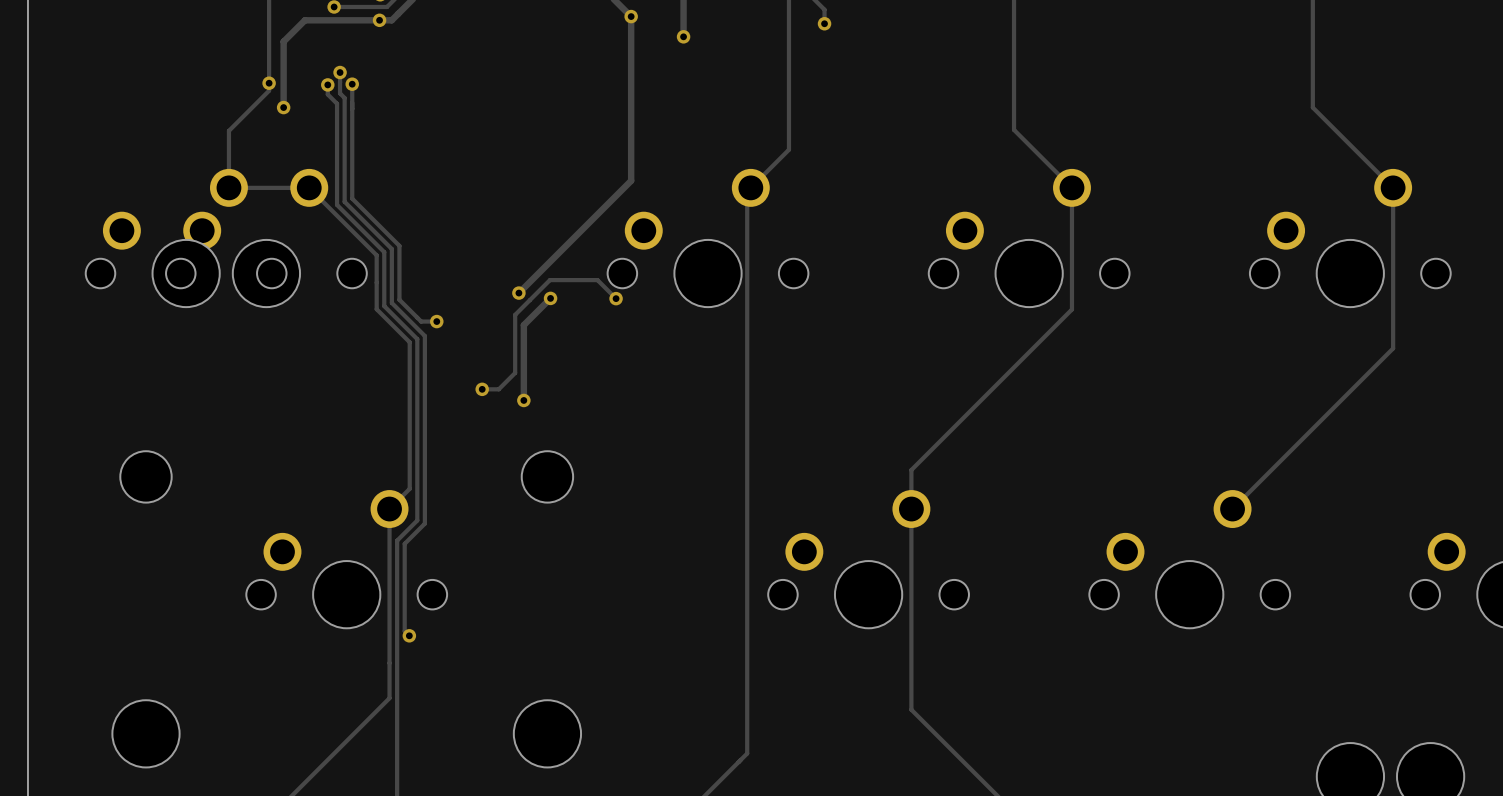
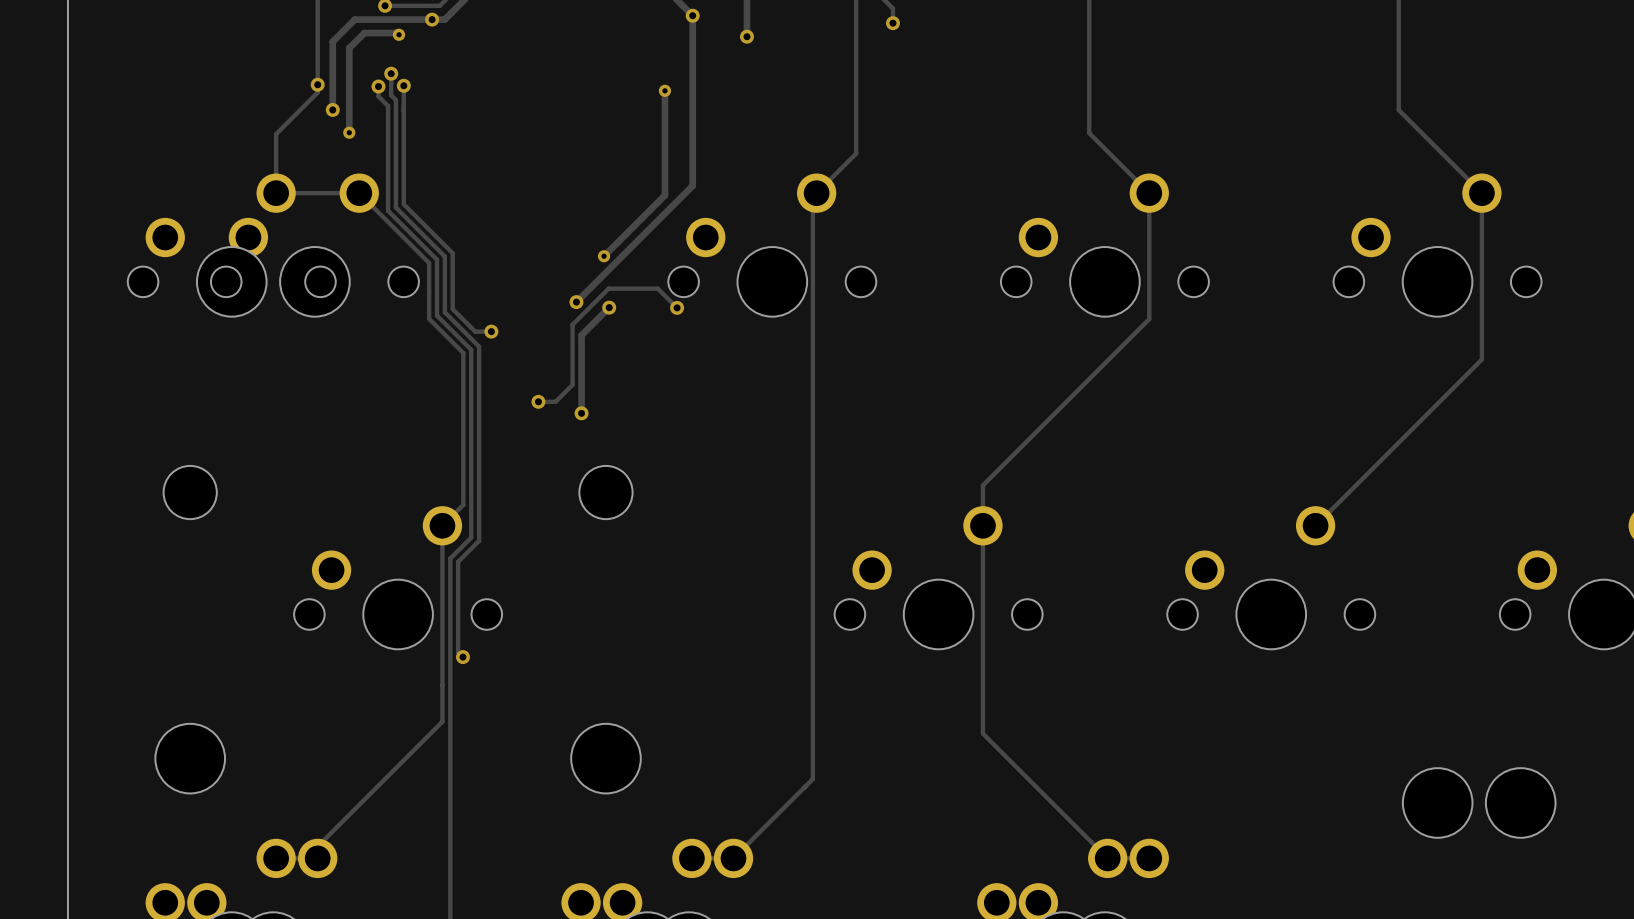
track: none -> (399, 34) (397, 33) (364, 33) (349, 48) (349, 132)
via: none -> (399, 34)
track: none -> (664, 90) (664, 195) (604, 256)
via: none -> (664, 90)
via: none -> (349, 132)
via: none -> (604, 256)

